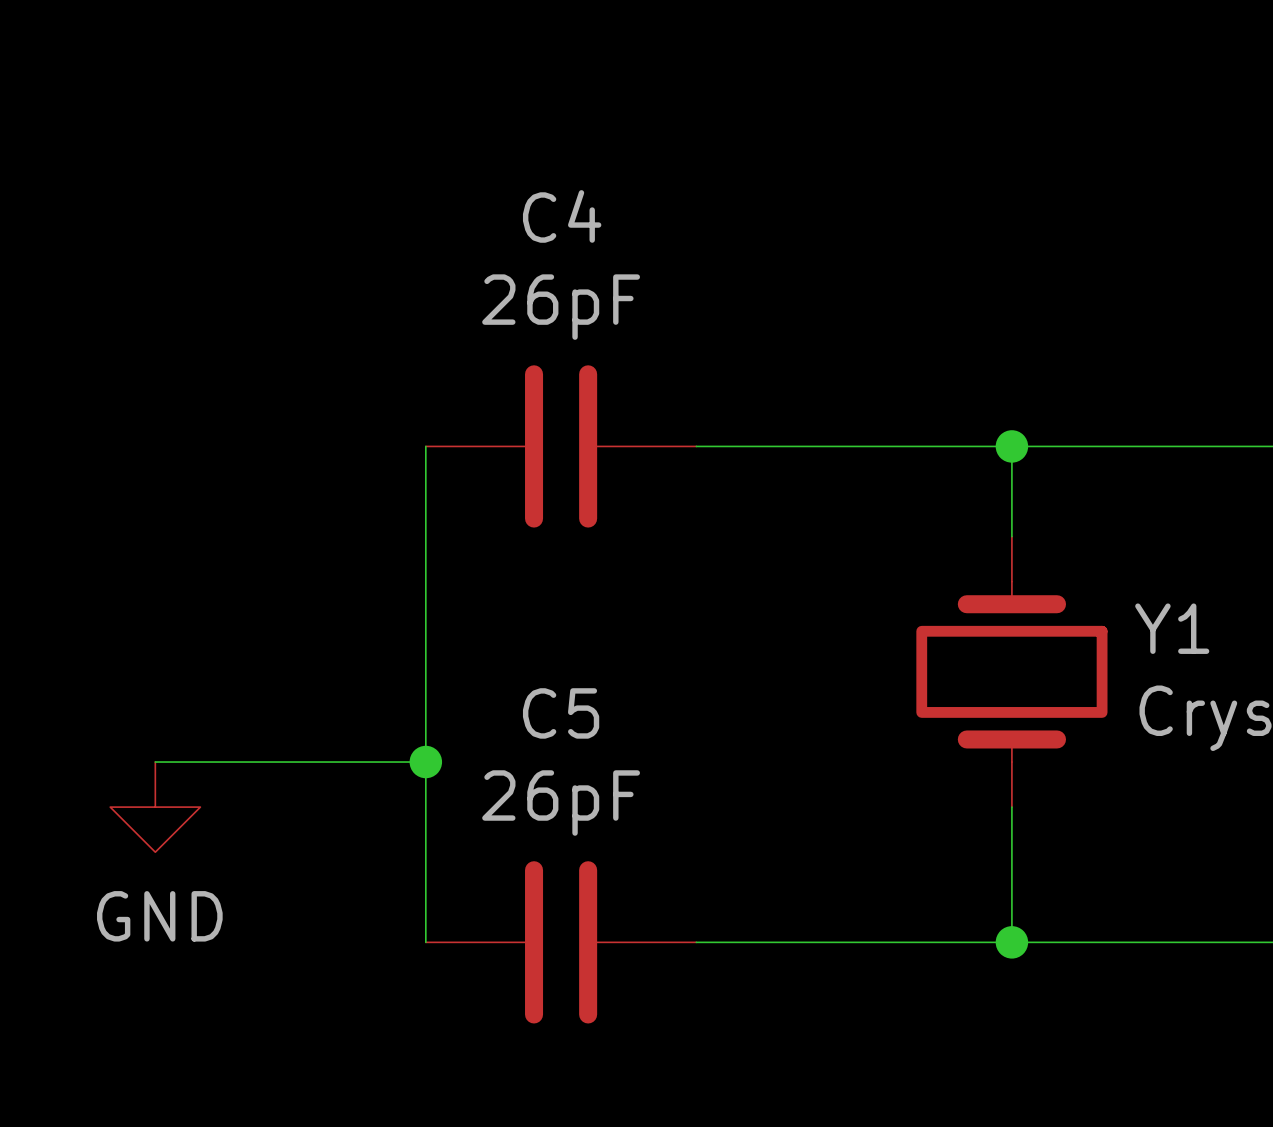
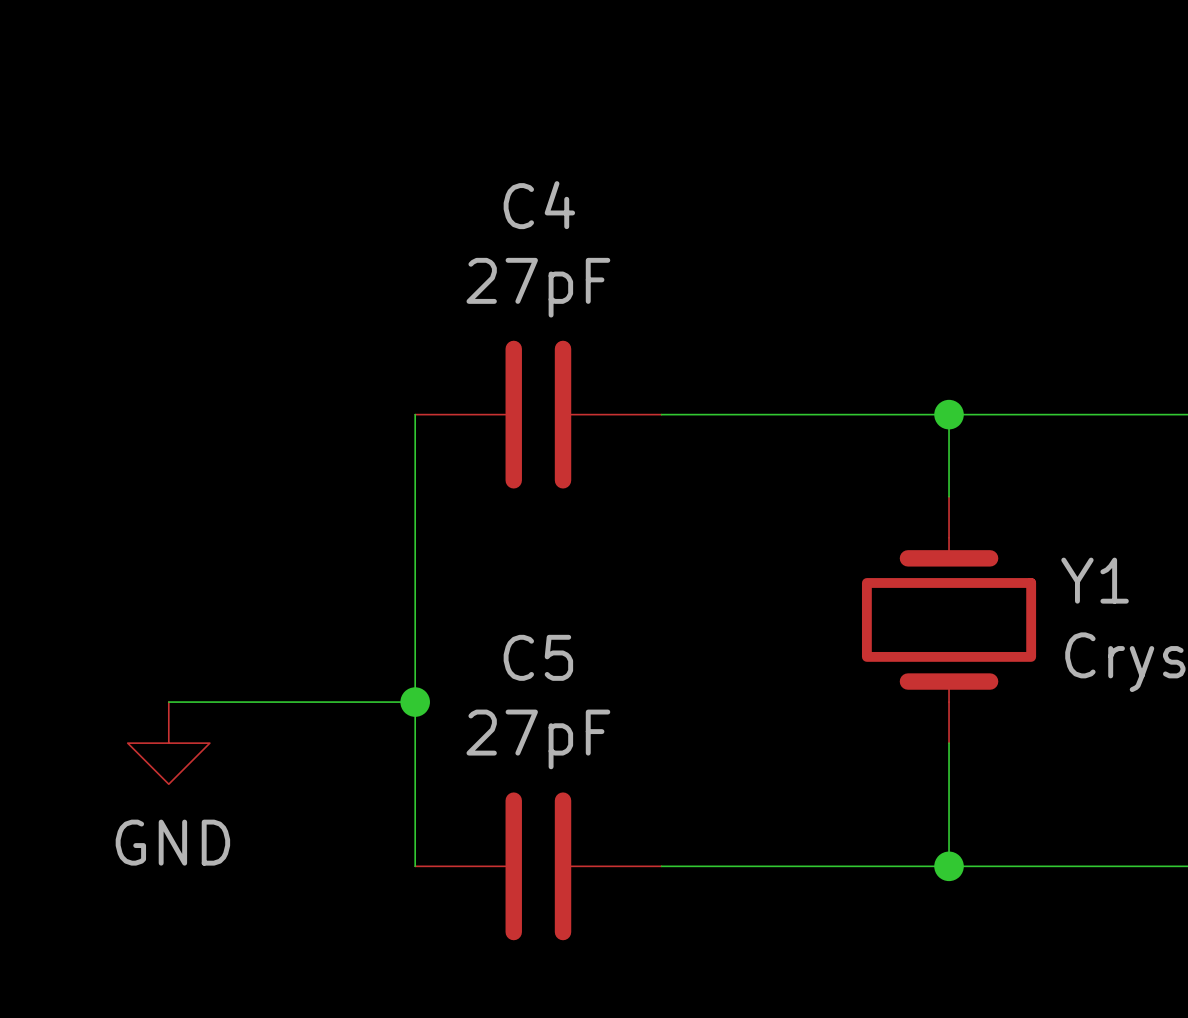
C4 value: 26pF (561, 307) -> 27pF (538, 287)
C5 value: 26pF (561, 803) -> 27pF (538, 739)

